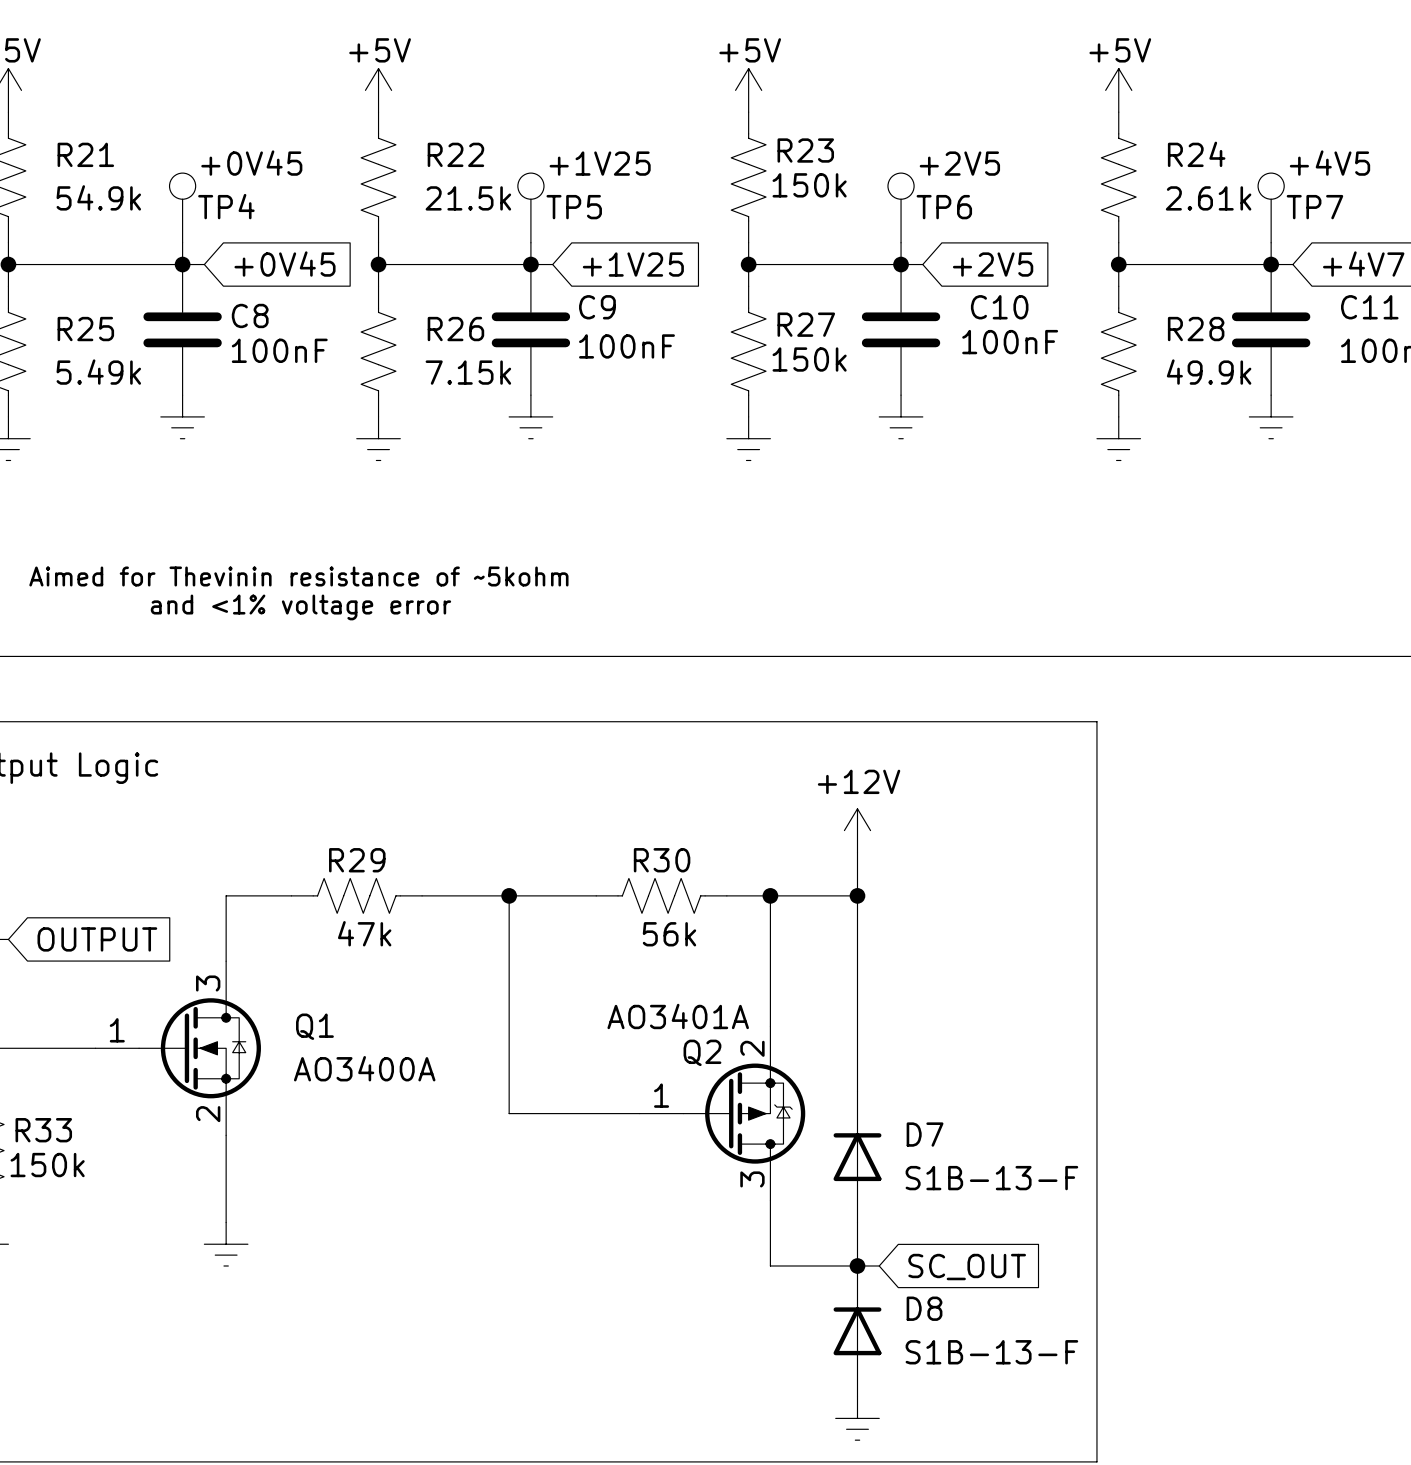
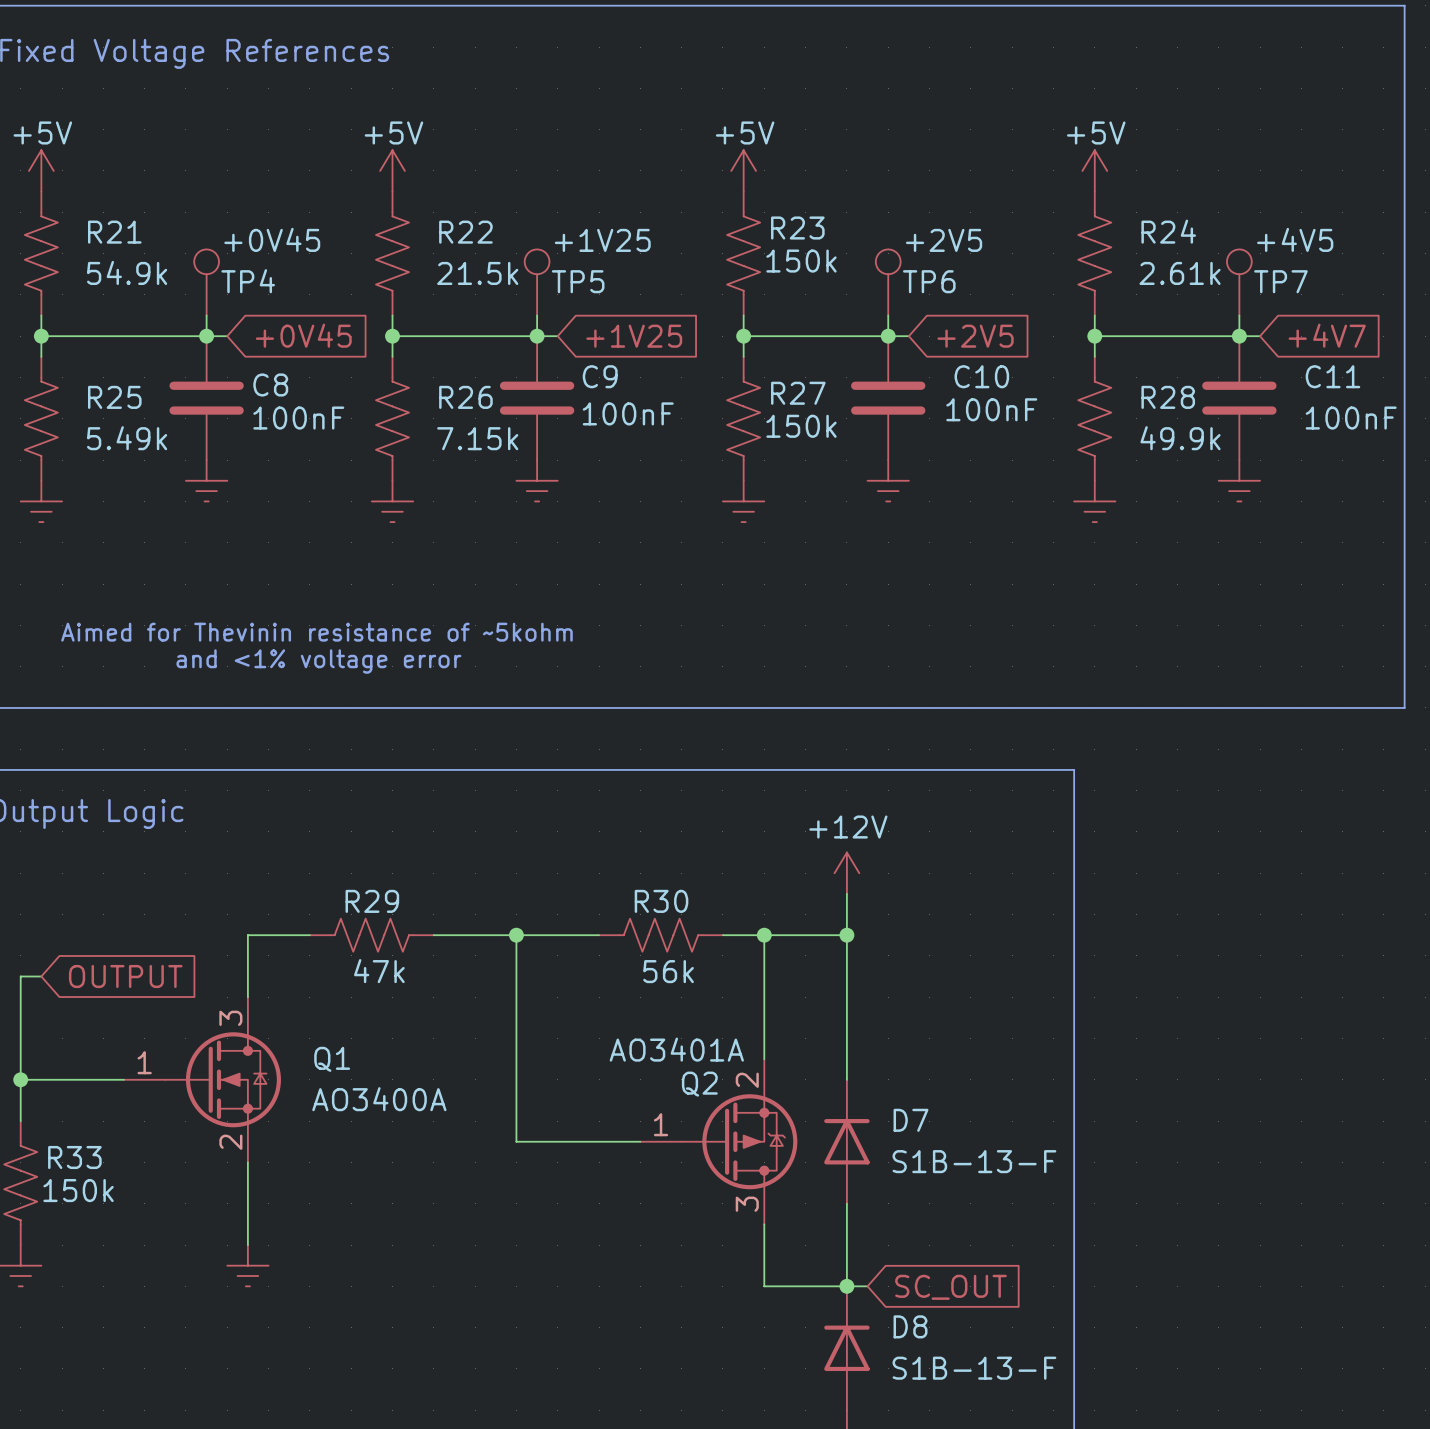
D7 position: (857, 1157) -> (846, 1141)

